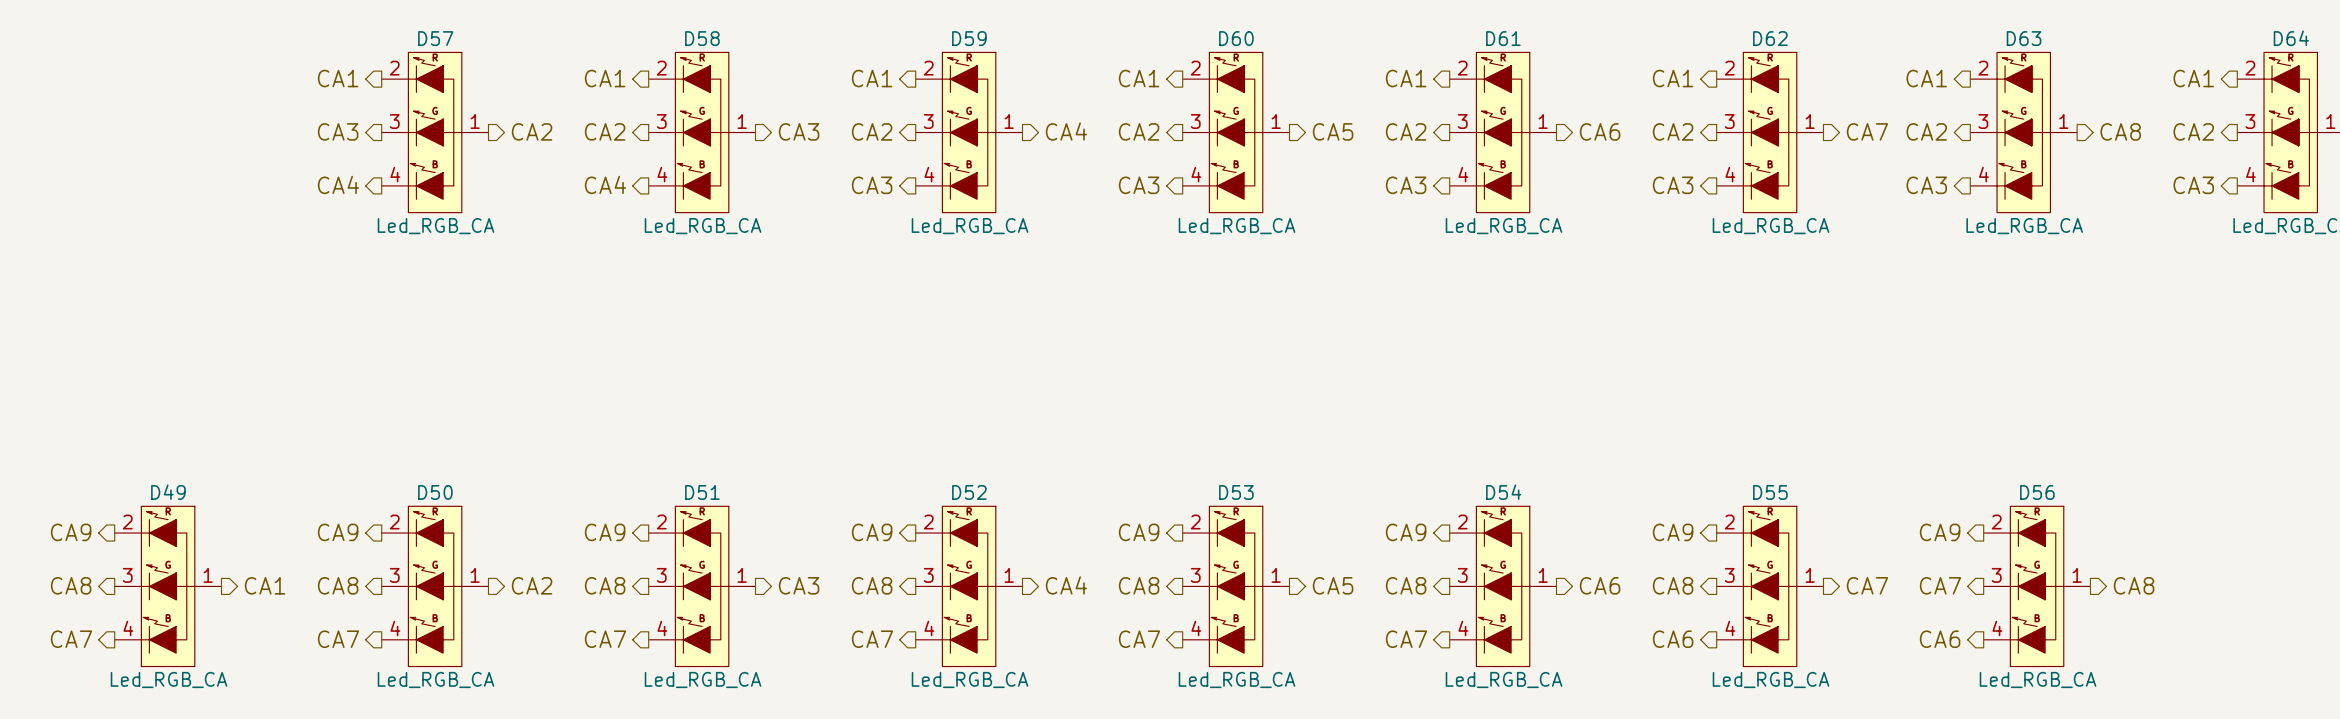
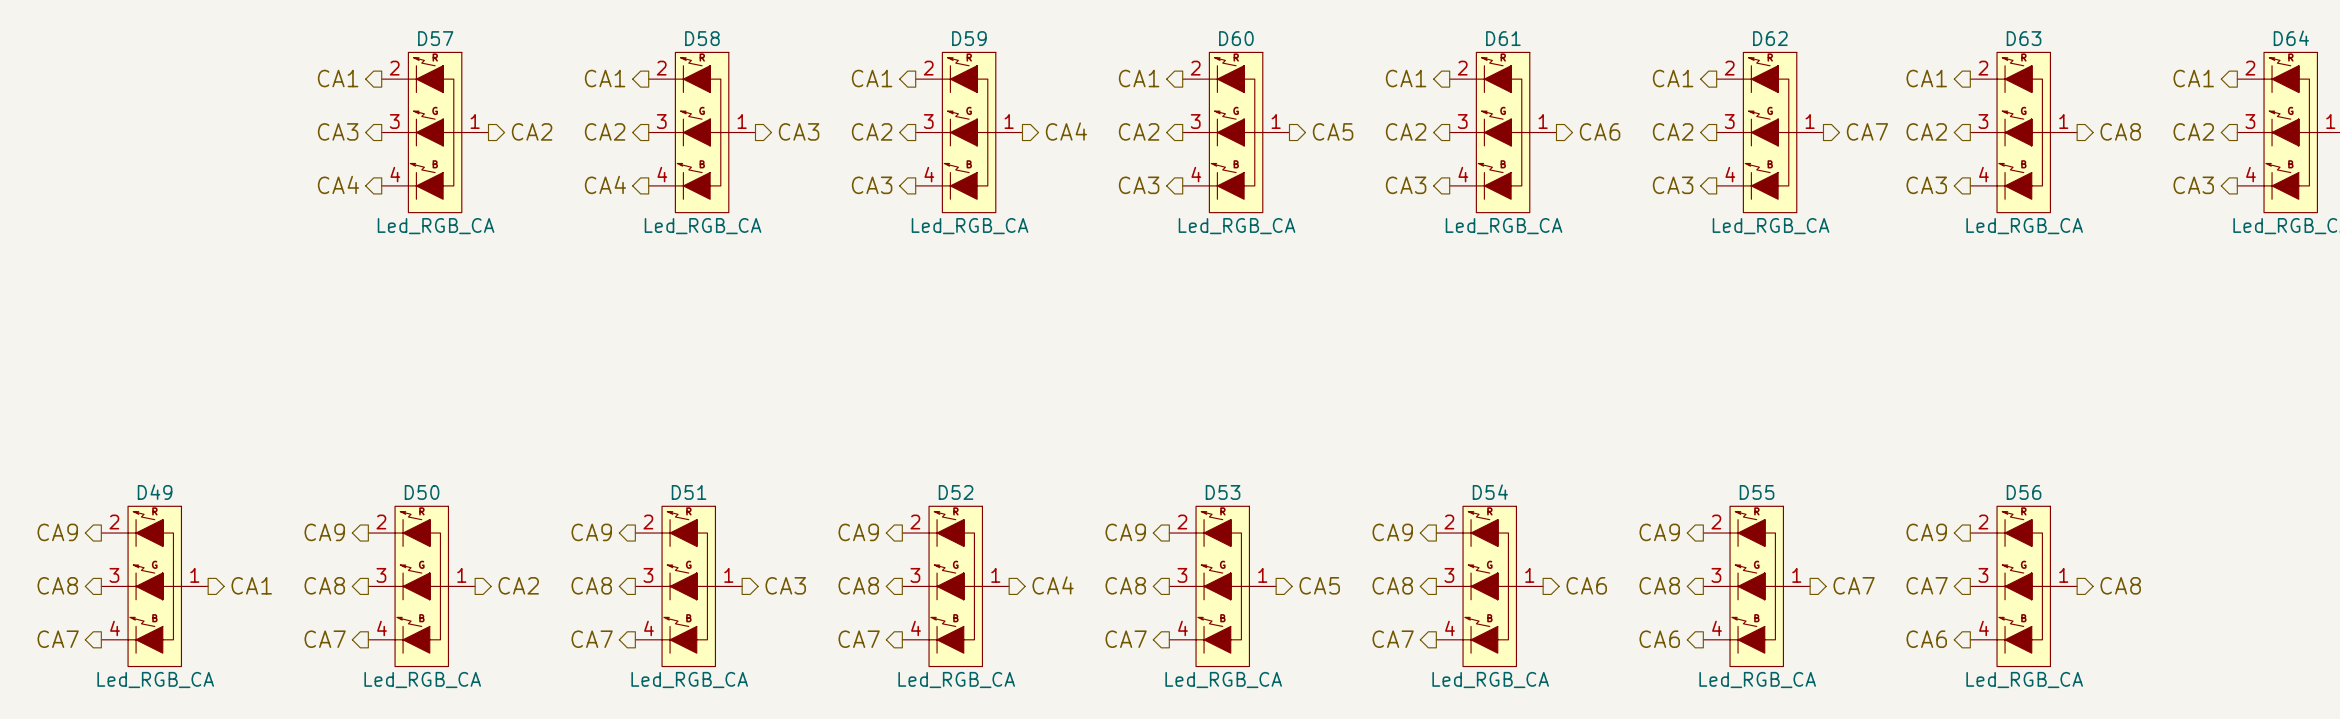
hierarchical label position: CA9 (71, 532) -> CA9 (57, 532)
hierarchical label position: CA9 (338, 532) -> CA9 (324, 532)
hierarchical label position: CA9 (605, 532) -> CA9 (591, 532)
hierarchical label position: CA9 (872, 532) -> CA9 (858, 532)
hierarchical label position: CA9 (1139, 532) -> CA9 (1125, 532)
hierarchical label position: CA9 (1406, 532) -> CA9 (1392, 532)
hierarchical label position: CA9 (1673, 532) -> CA9 (1659, 532)
hierarchical label position: CA9 (1940, 532) -> CA9 (1926, 532)
hierarchical label position: CA8 (71, 585) -> CA8 (57, 585)
hierarchical label position: CA1 (265, 585) -> CA1 (251, 585)
hierarchical label position: CA8 (338, 585) -> CA8 (324, 585)
hierarchical label position: CA2 (532, 585) -> CA2 (518, 585)
hierarchical label position: CA8 (605, 585) -> CA8 (591, 585)
hierarchical label position: CA3 (799, 585) -> CA3 (785, 585)
hierarchical label position: CA8 (872, 585) -> CA8 (858, 585)
hierarchical label position: CA4 (1066, 585) -> CA4 (1053, 585)
hierarchical label position: CA8 (1139, 585) -> CA8 (1125, 585)
hierarchical label position: CA5 (1333, 585) -> CA5 (1319, 585)
hierarchical label position: CA8 (1406, 585) -> CA8 (1392, 585)
hierarchical label position: CA6 (1600, 585) -> CA6 (1586, 585)
hierarchical label position: CA8 (1673, 585) -> CA8 (1659, 585)
hierarchical label position: CA7 (1867, 585) -> CA7 (1854, 585)
hierarchical label position: CA7 (1940, 585) -> CA7 (1927, 585)
hierarchical label position: CA8 (2134, 585) -> CA8 (2120, 585)
D49 position: (168, 586) -> (154, 586)
D50 position: (435, 586) -> (421, 586)
D51 position: (702, 586) -> (688, 586)
D52 position: (969, 586) -> (955, 586)
D53 position: (1236, 586) -> (1222, 586)
D54 position: (1503, 586) -> (1489, 586)
D55 position: (1770, 586) -> (1756, 586)
D56 position: (2037, 586) -> (2023, 586)
hierarchical label position: CA7 (71, 639) -> CA7 (58, 639)
hierarchical label position: CA7 (338, 639) -> CA7 (325, 639)
hierarchical label position: CA7 (605, 639) -> CA7 (592, 639)
hierarchical label position: CA7 (872, 639) -> CA7 (859, 639)
hierarchical label position: CA7 (1139, 639) -> CA7 (1126, 639)
hierarchical label position: CA7 (1406, 639) -> CA7 (1393, 639)
hierarchical label position: CA6 (1673, 639) -> CA6 (1659, 639)
hierarchical label position: CA6 (1940, 639) -> CA6 (1926, 639)

